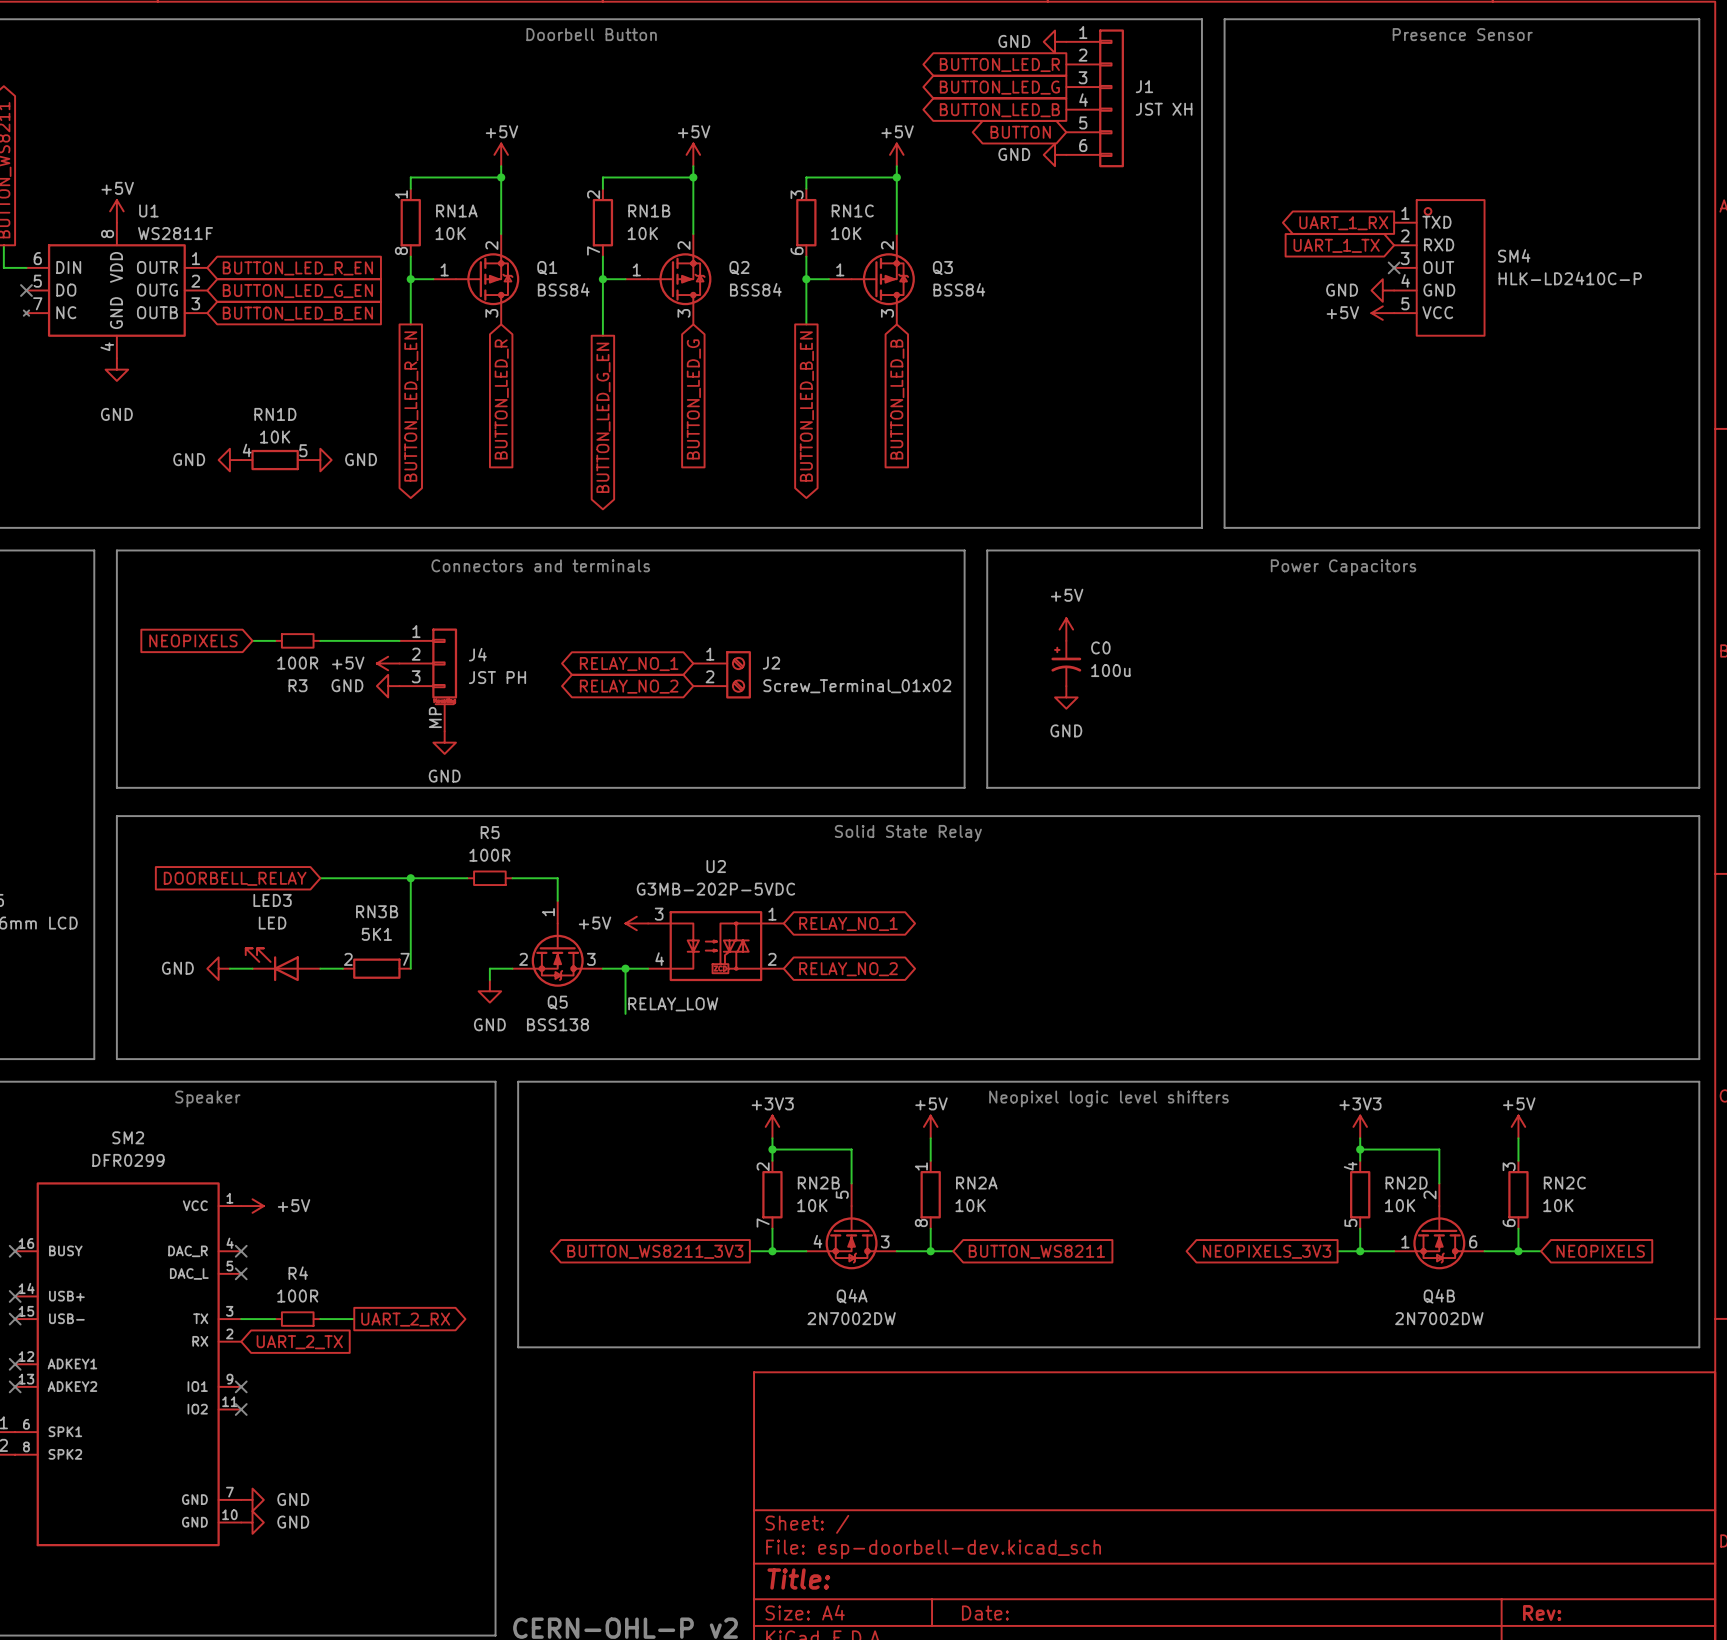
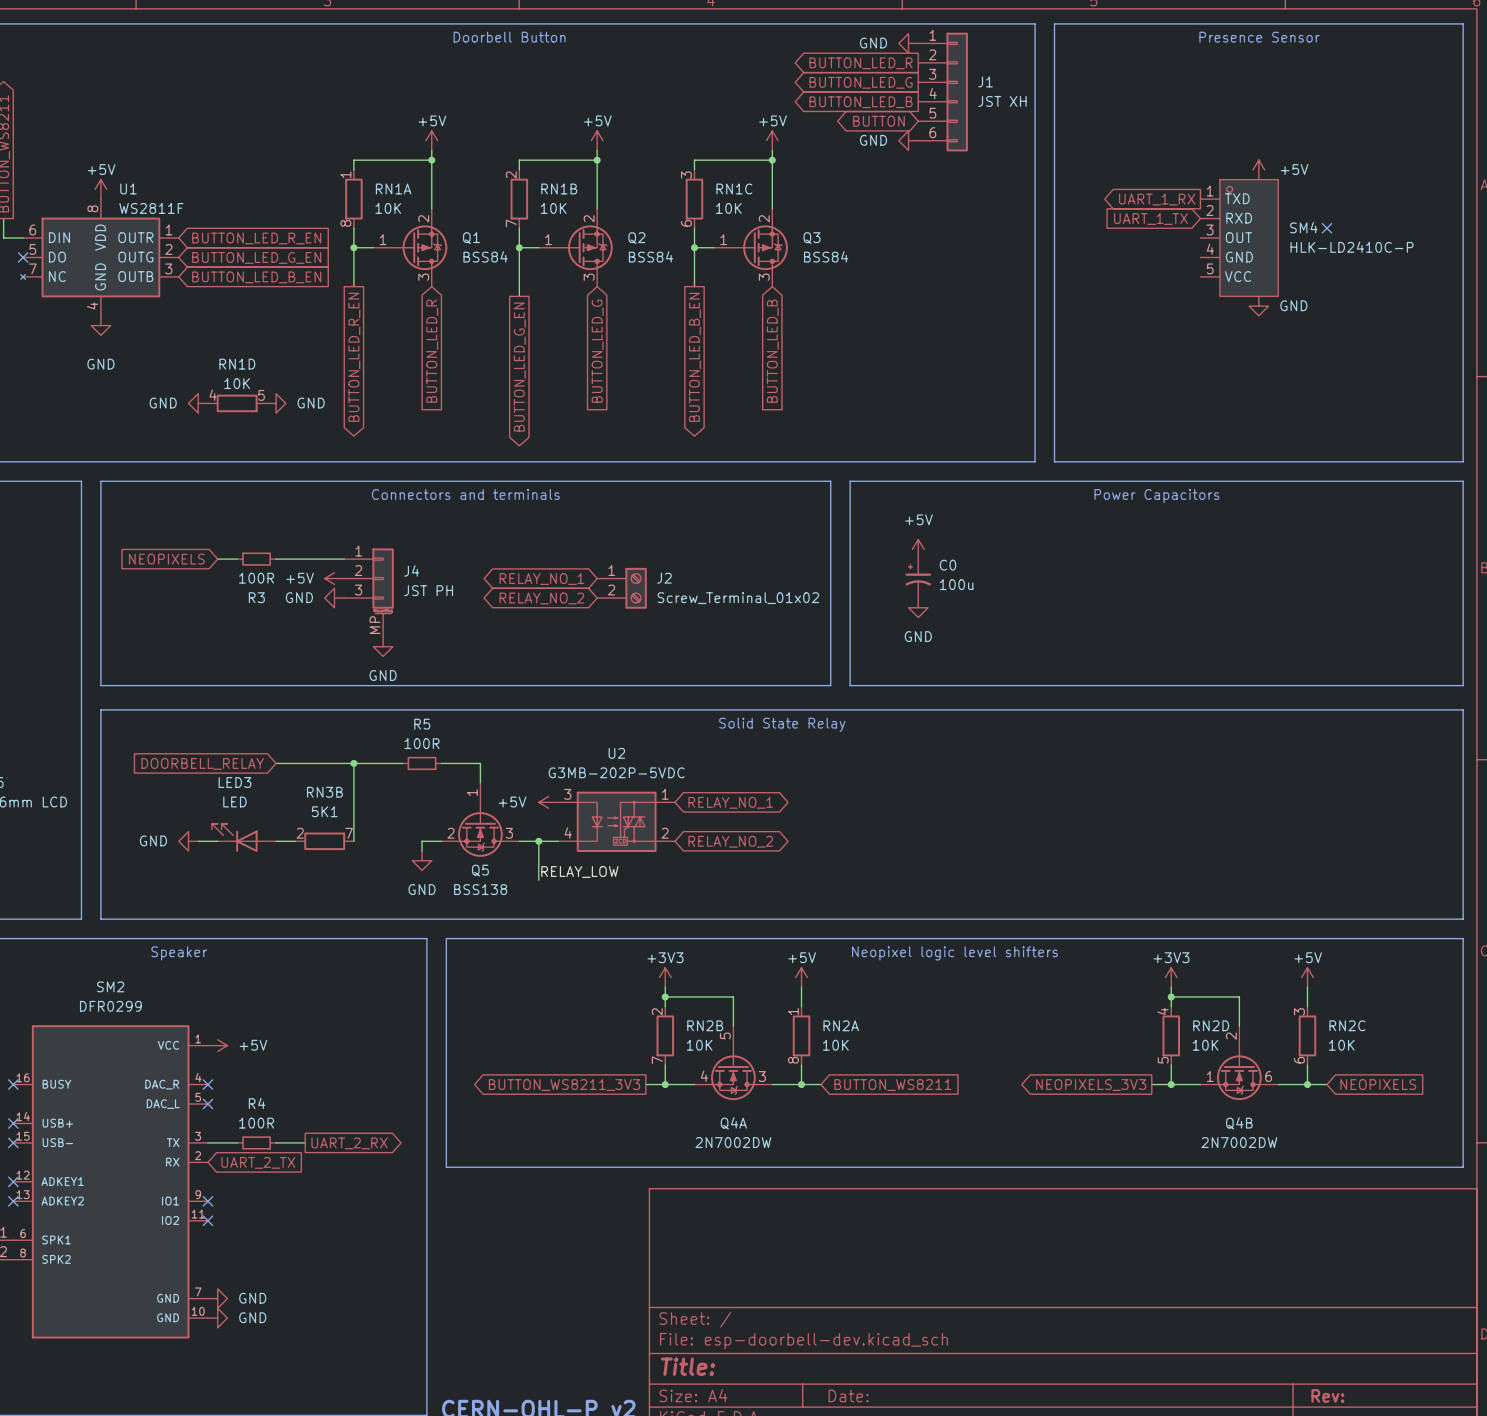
no-connect mark: none -> (1326, 228)
no-connect mark: (1394, 267) -> none
power symbol text position: GND (1342, 290) -> GND (1293, 305)
power symbol rotation: 0° (1382, 290) -> 90° counterclockwise (1258, 306)
power symbol position: GND (1382, 290) -> GND (1258, 306)
power symbol text position: +5V (1342, 312) -> +5V (1294, 169)
power symbol rotation: 0° (1382, 313) -> 90° clockwise (1258, 169)
power symbol position: +5V (1382, 313) -> +5V (1258, 169)

